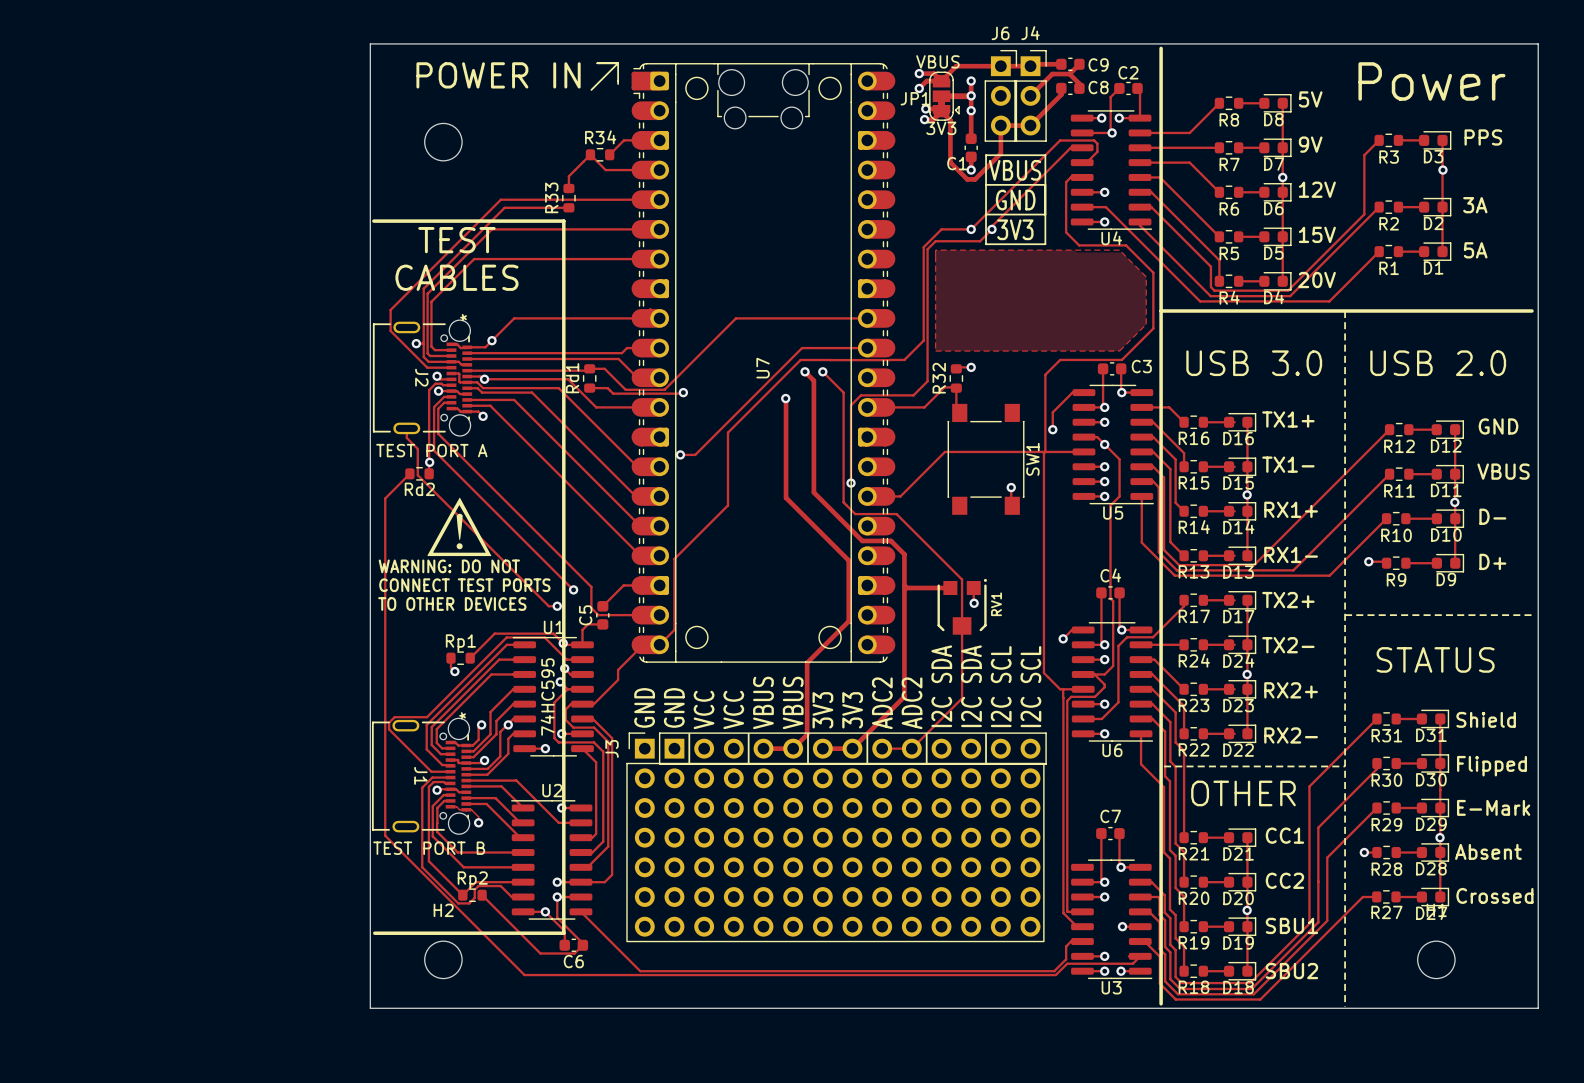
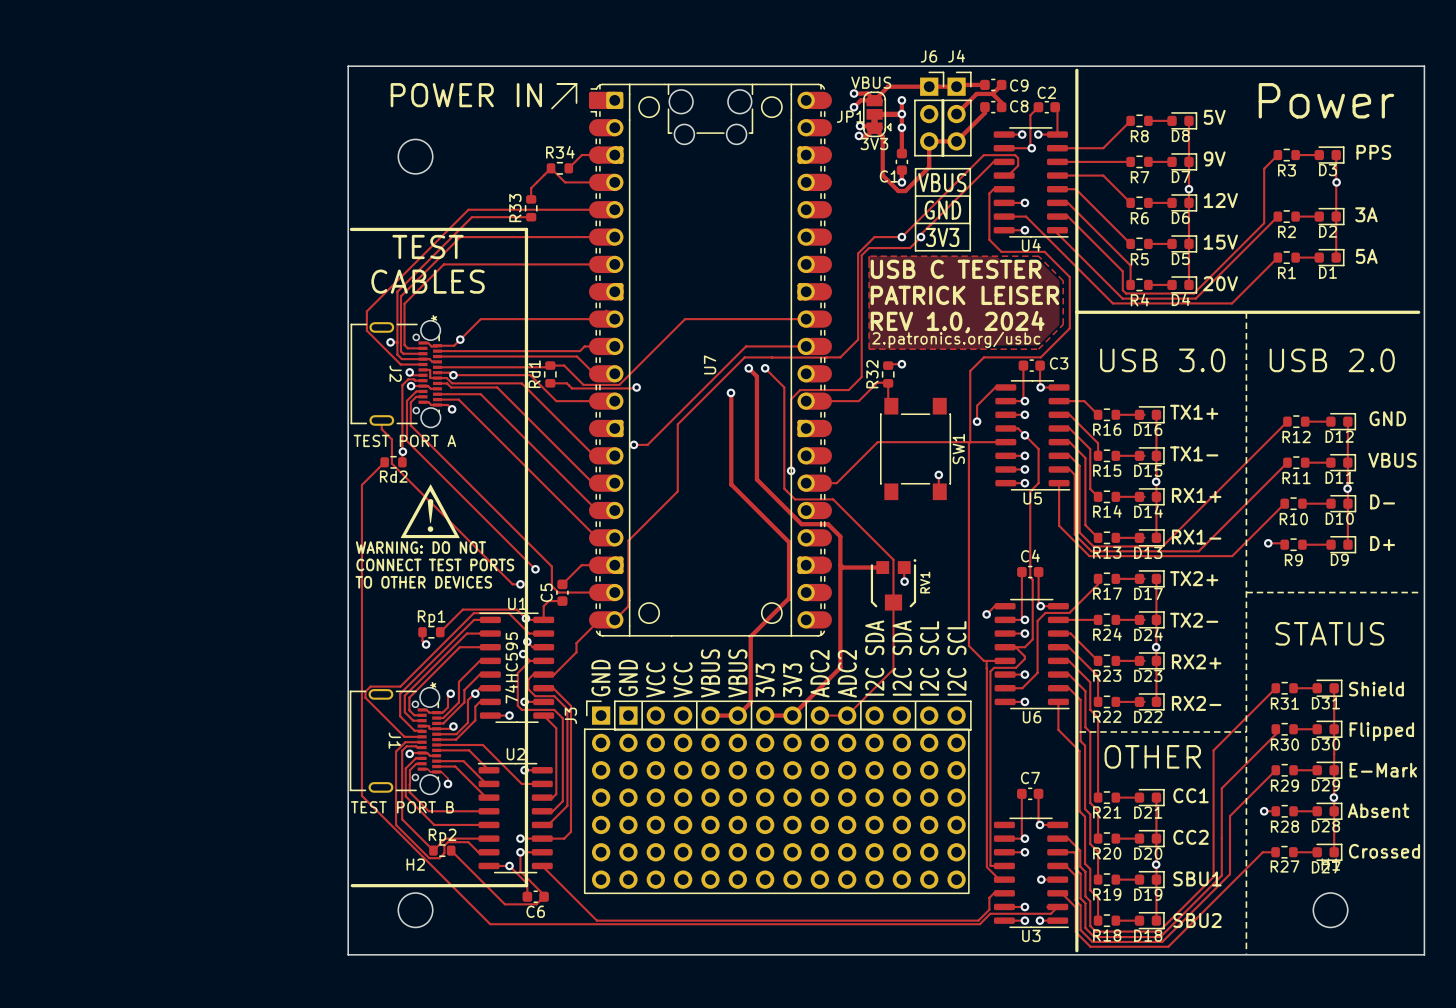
text: none -> USB C TESTER (956, 269)
text: none -> PATRICK LEISER (964, 295)
text: none -> REV 1.0, 2024 (957, 322)
text: none -> 2.patronics.org/usbc (956, 339)

